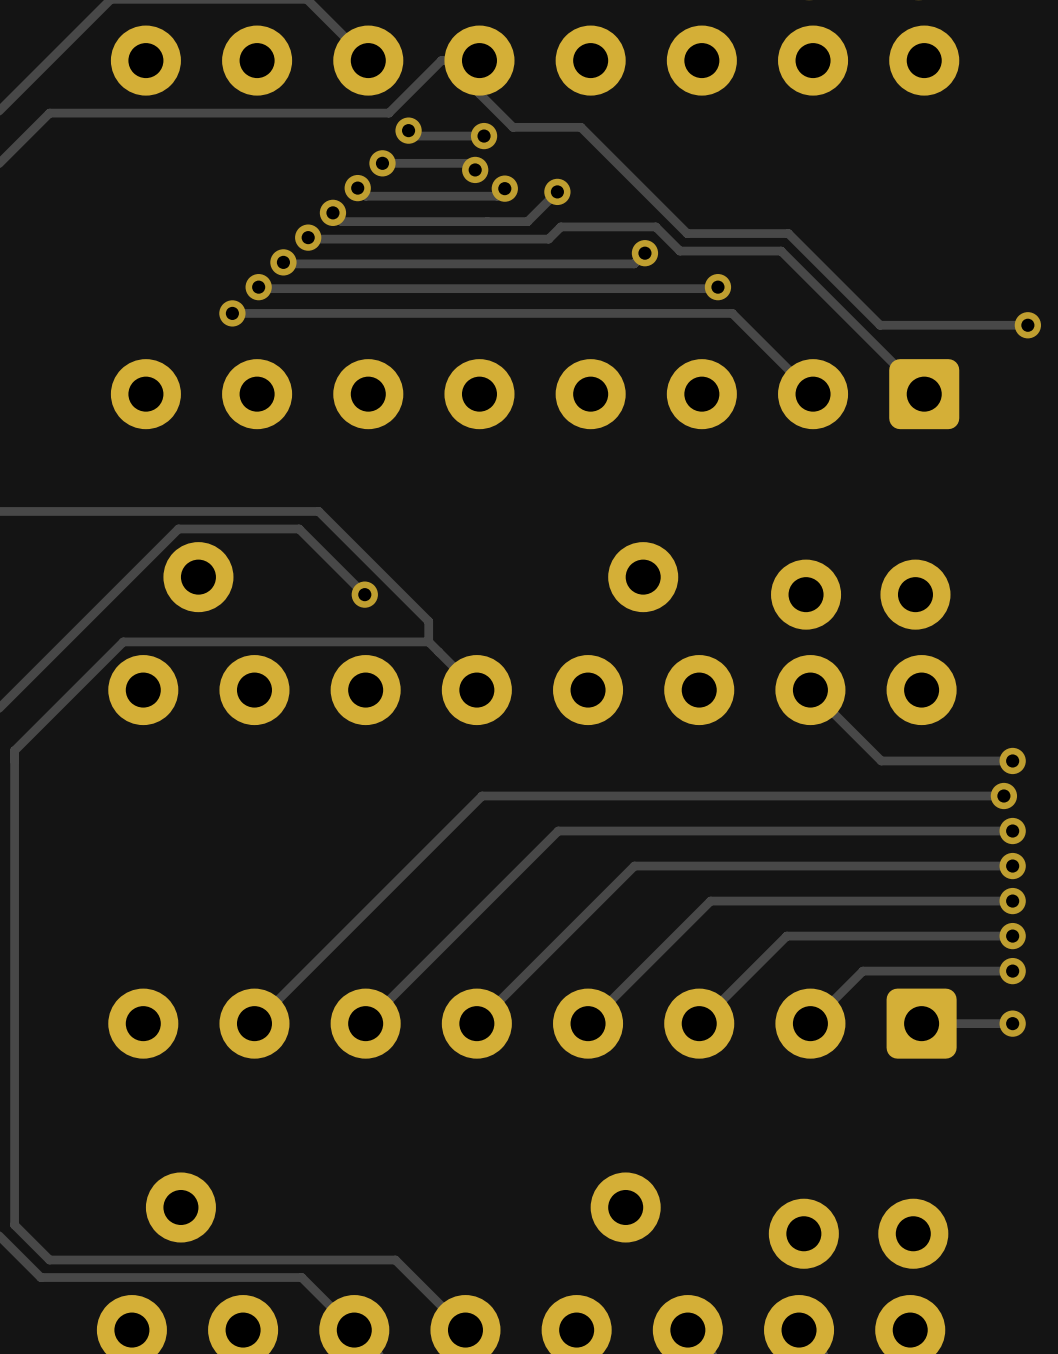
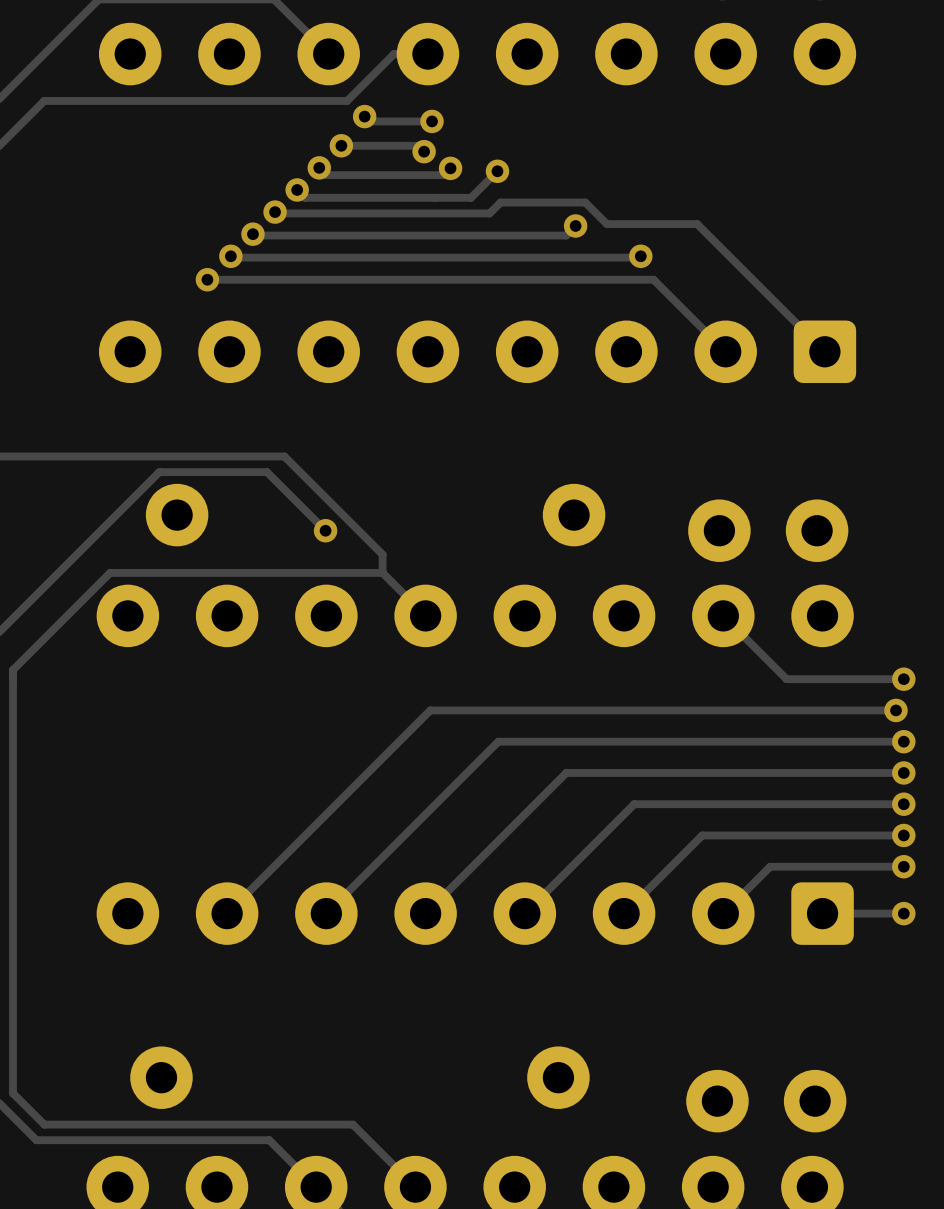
track: (479, 60) (479, 93) (513, 127) (581, 127) (687, 233) (788, 233) (880, 325) (1027, 325) -> none
via: (1027, 325) -> none

